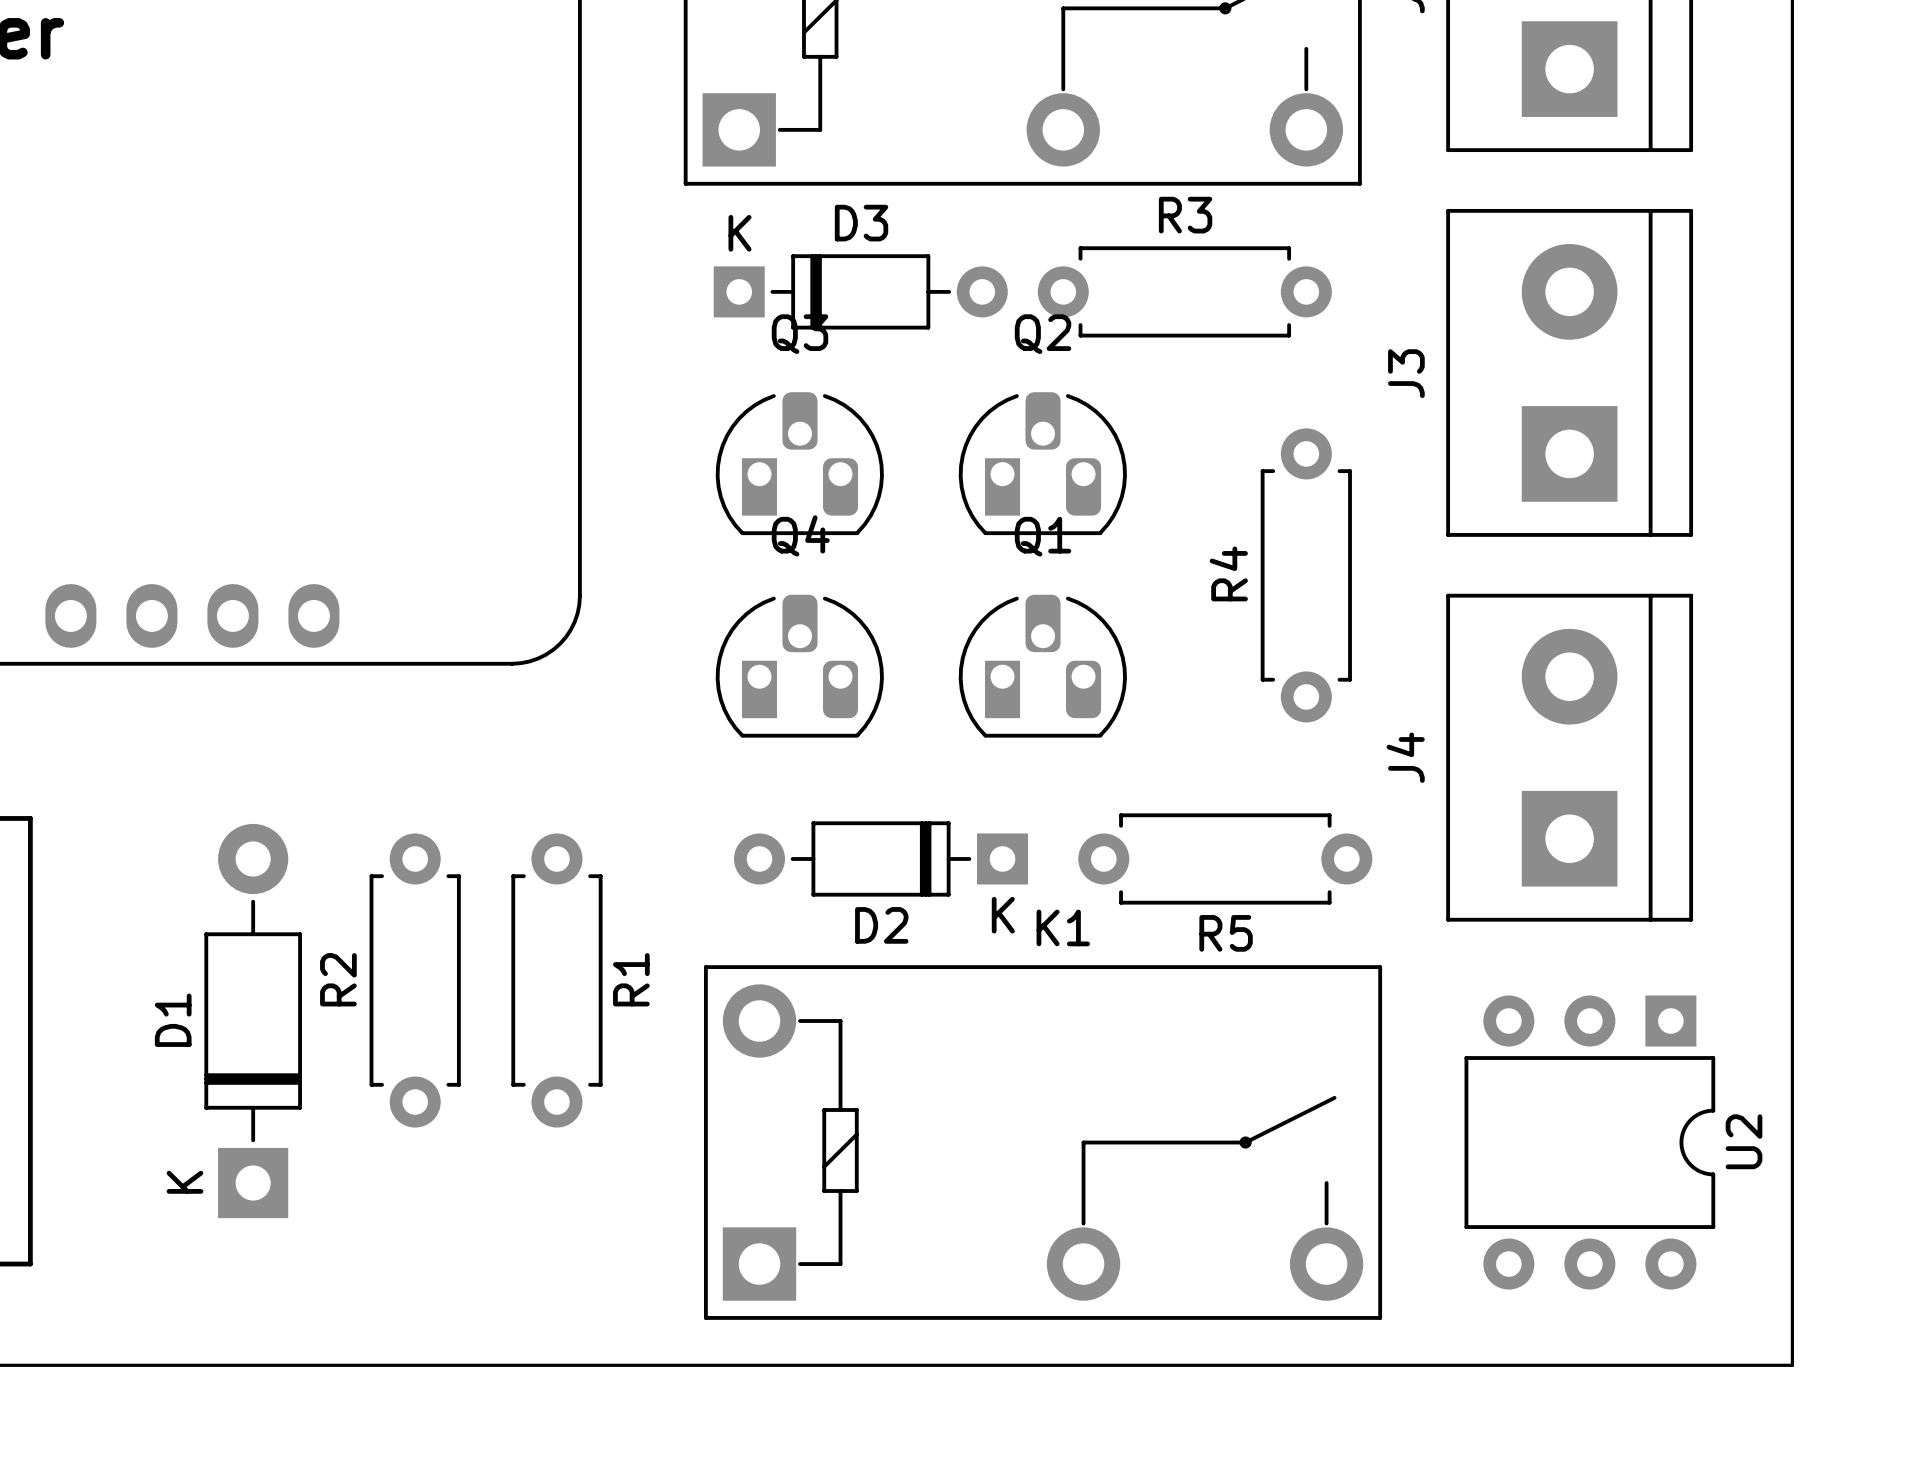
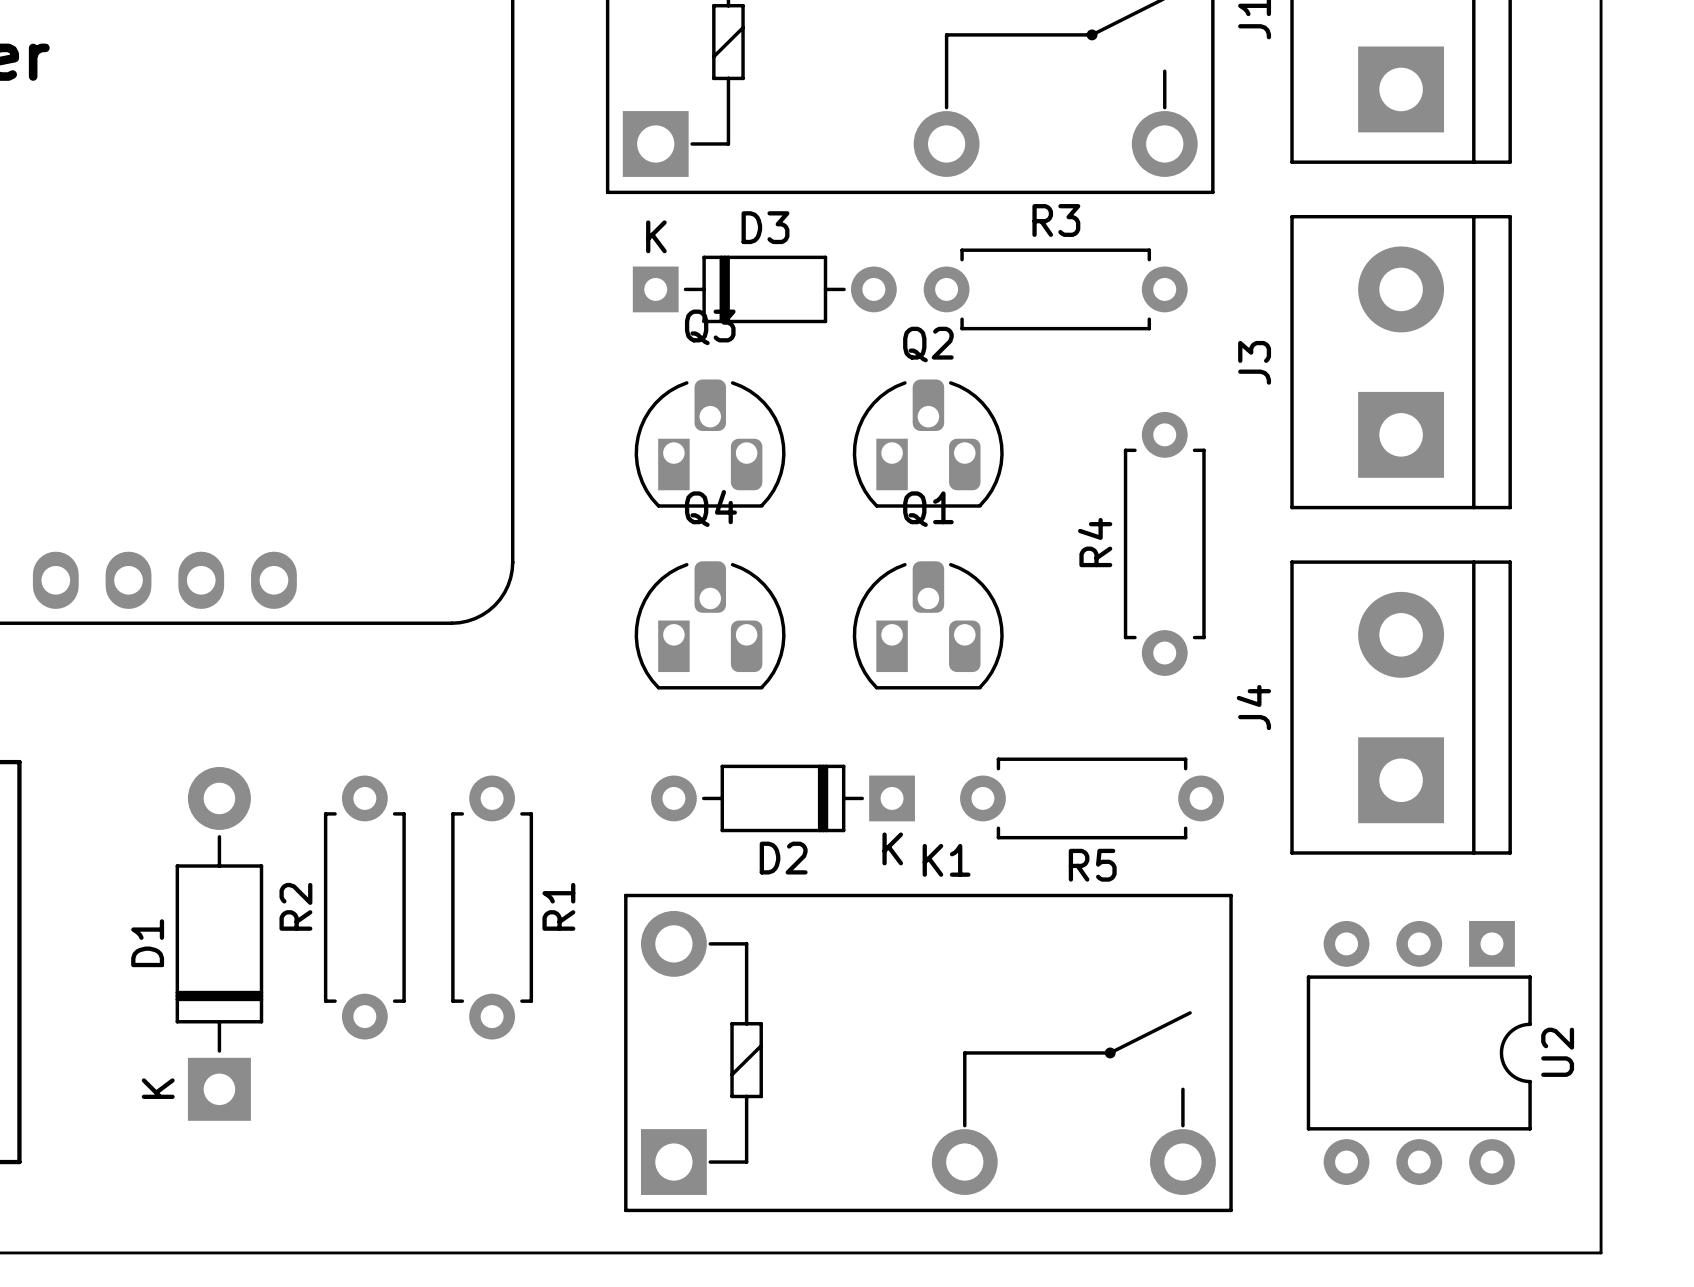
Q2 name position: Q2 (1043, 334) -> Q2 (928, 344)

